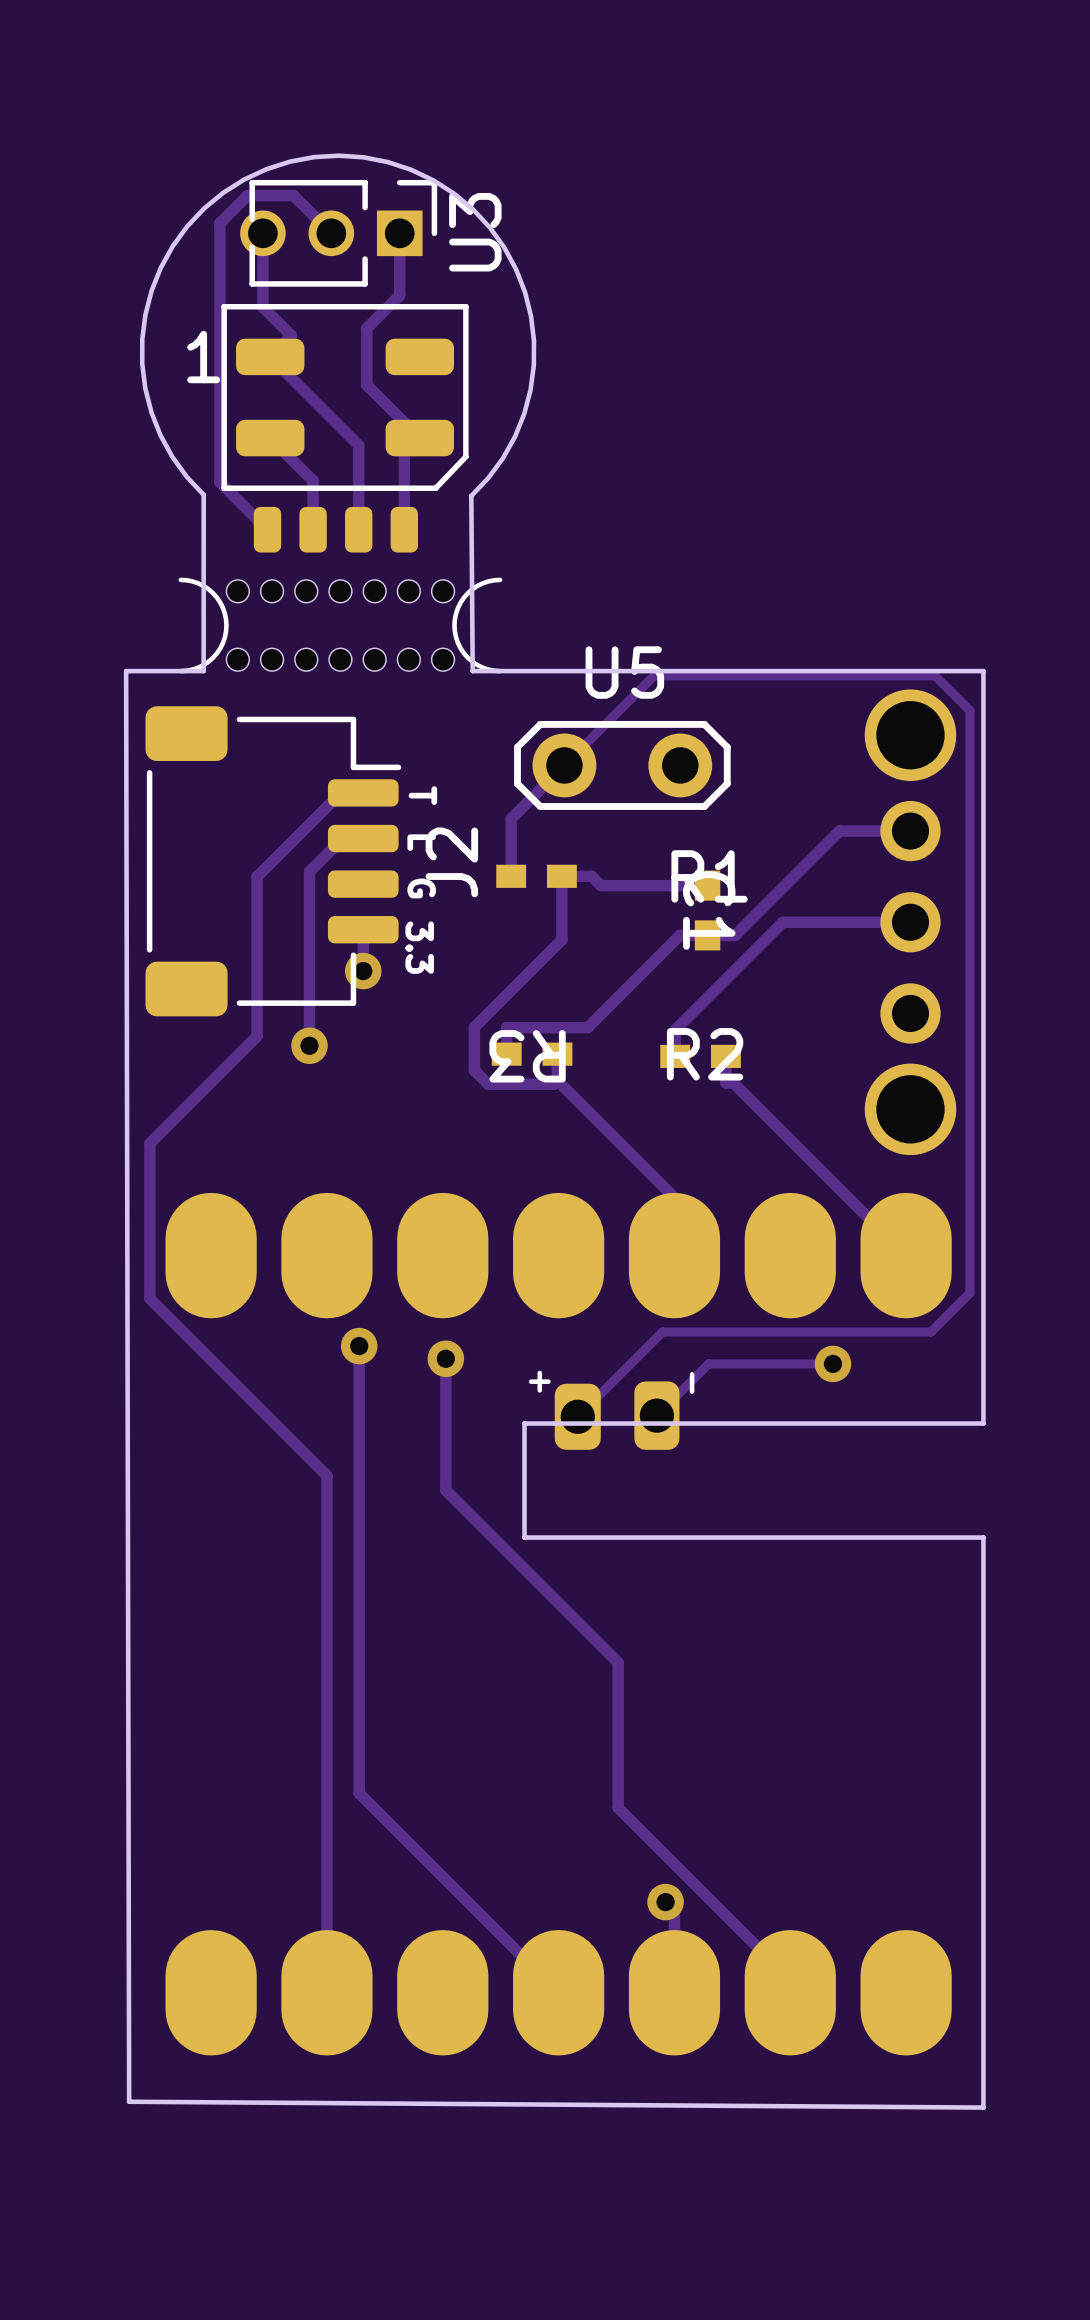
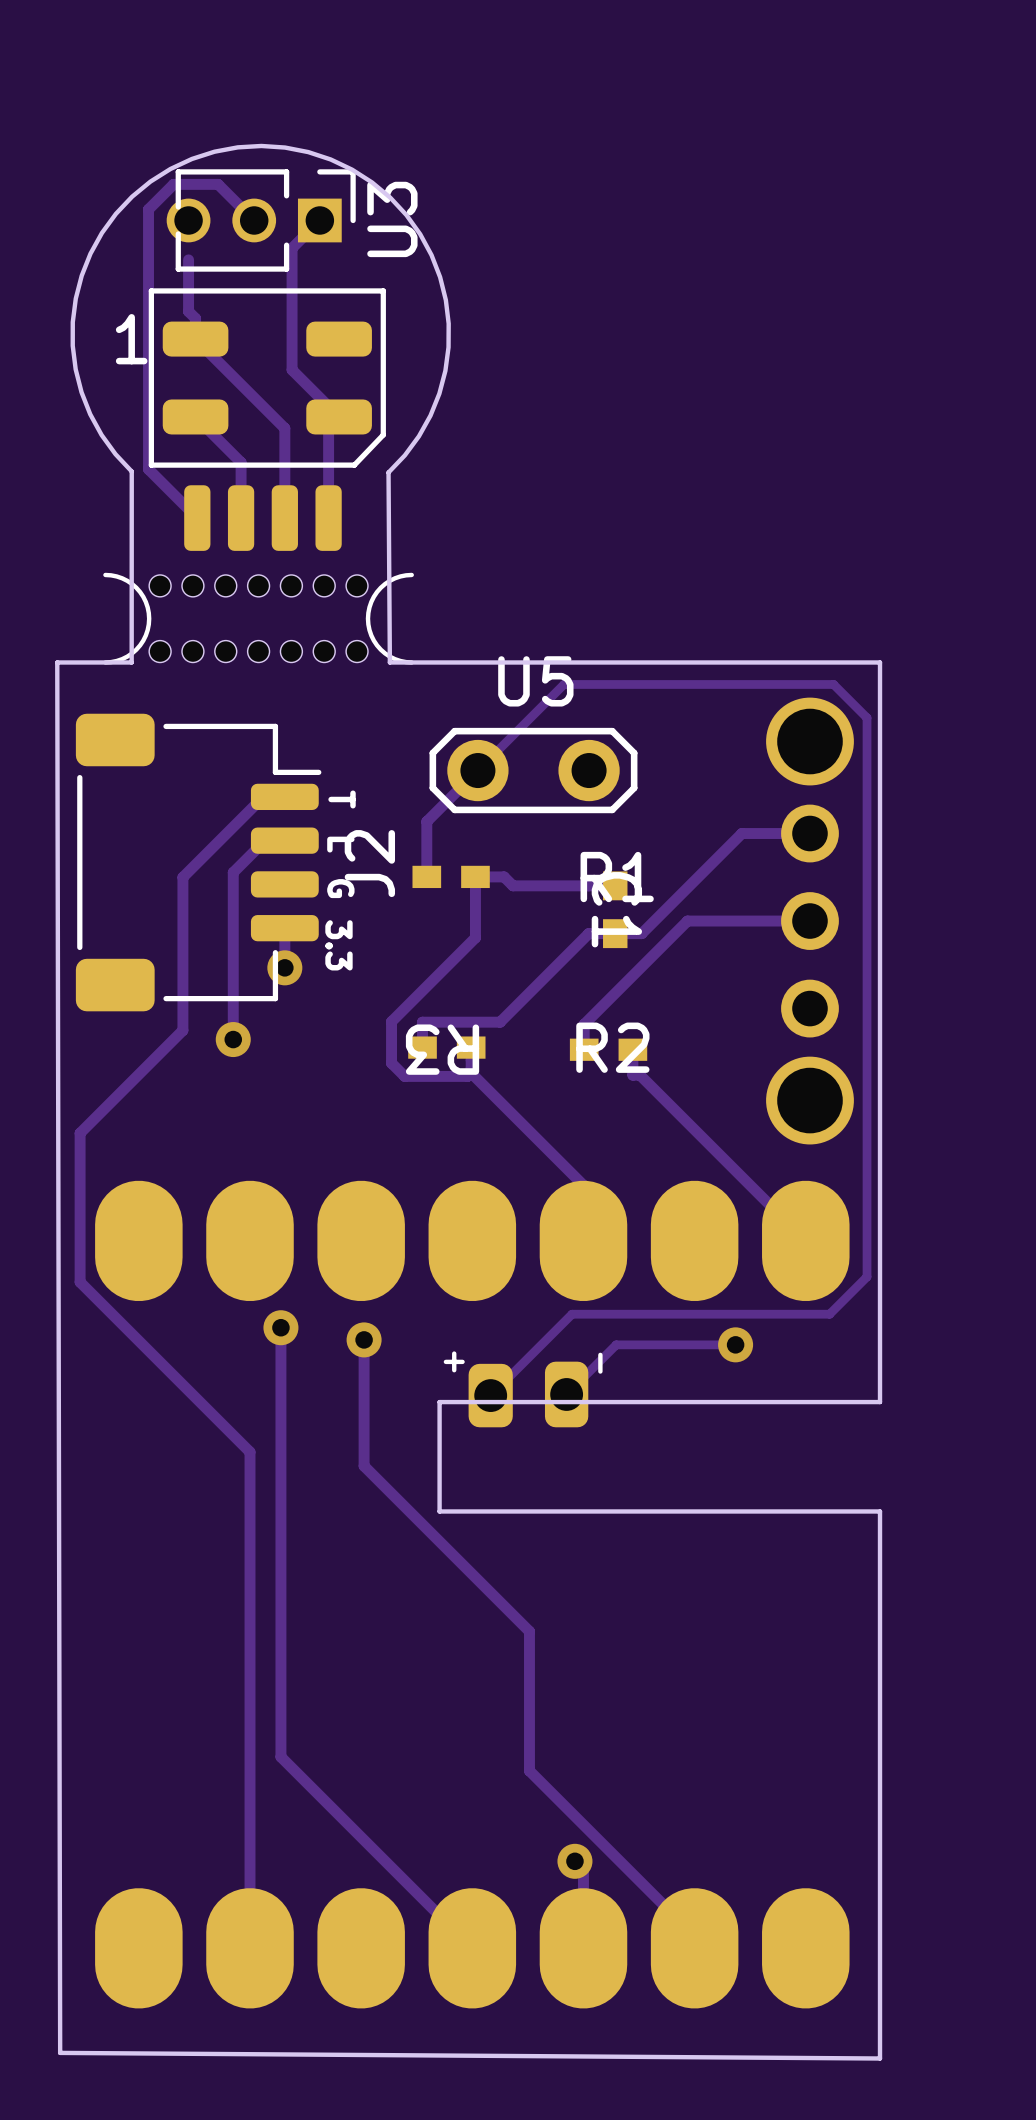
track: none -> (254, 220) (218, 184) (173, 184) (148, 209) (148, 469) (197, 518)
track: none -> (319, 220) (292, 248) (292, 369) (339, 416) (328, 427) (328, 518)
track: (331, 233) (293, 195) (247, 195) (219, 223) (219, 482) (267, 529) -> none
U3 position: (338, 233) -> (261, 220)
track: (399, 233) (399, 295) (366, 328) (366, 385) (419, 438) (404, 453) (404, 529) -> none
track: (262, 287) (262, 307) (291, 335) (270, 356) (358, 445) (358, 529) -> (188, 311) (195, 318) (195, 339) (284, 428) (284, 518)
track: none -> (195, 416) (241, 462) (241, 518)
part position: (345, 397) -> (267, 378)
track: (270, 438) (313, 480) (313, 529) -> none
part footprint: [253, 506, 418, 553] -> [184, 485, 342, 551]
part position: (340, 625) -> (258, 618)
board edge: (983, 671) (472, 671) (471, 495) (488, 478) (502, 458) (515, 436) (524, 413) (530, 389) (533, 365) (533, 340) (531, 316) (525, 292) (516, 269) (504, 247) (489, 227) (473, 209) (454, 193) (433, 180) (411, 169) (387, 162) (363, 157) (338, 155) (314, 157) (289, 161) (266, 169) (244, 179) (223, 192) (204, 208) (187, 226) (172, 246) (160, 267) (151, 290) (145, 314) (142, 339) (142, 363) (145, 388) (151, 412) (160, 435) (172, 456) (186, 476) (203, 494) (203, 671) (126, 671) (129, 2101) -> (880, 679) (880, 662) (389, 662) (388, 472) (418, 436) (430, 415) (445, 370) (448, 347) (445, 300) (440, 277) (420, 234) (390, 197) (352, 169) (308, 152) (261, 145) (214, 151) (170, 168) (132, 196) (101, 232) (81, 275) (75, 298) (72, 345) (75, 369) (90, 414) (115, 454) (131, 471) (131, 662) (57, 662) (60, 2052)

